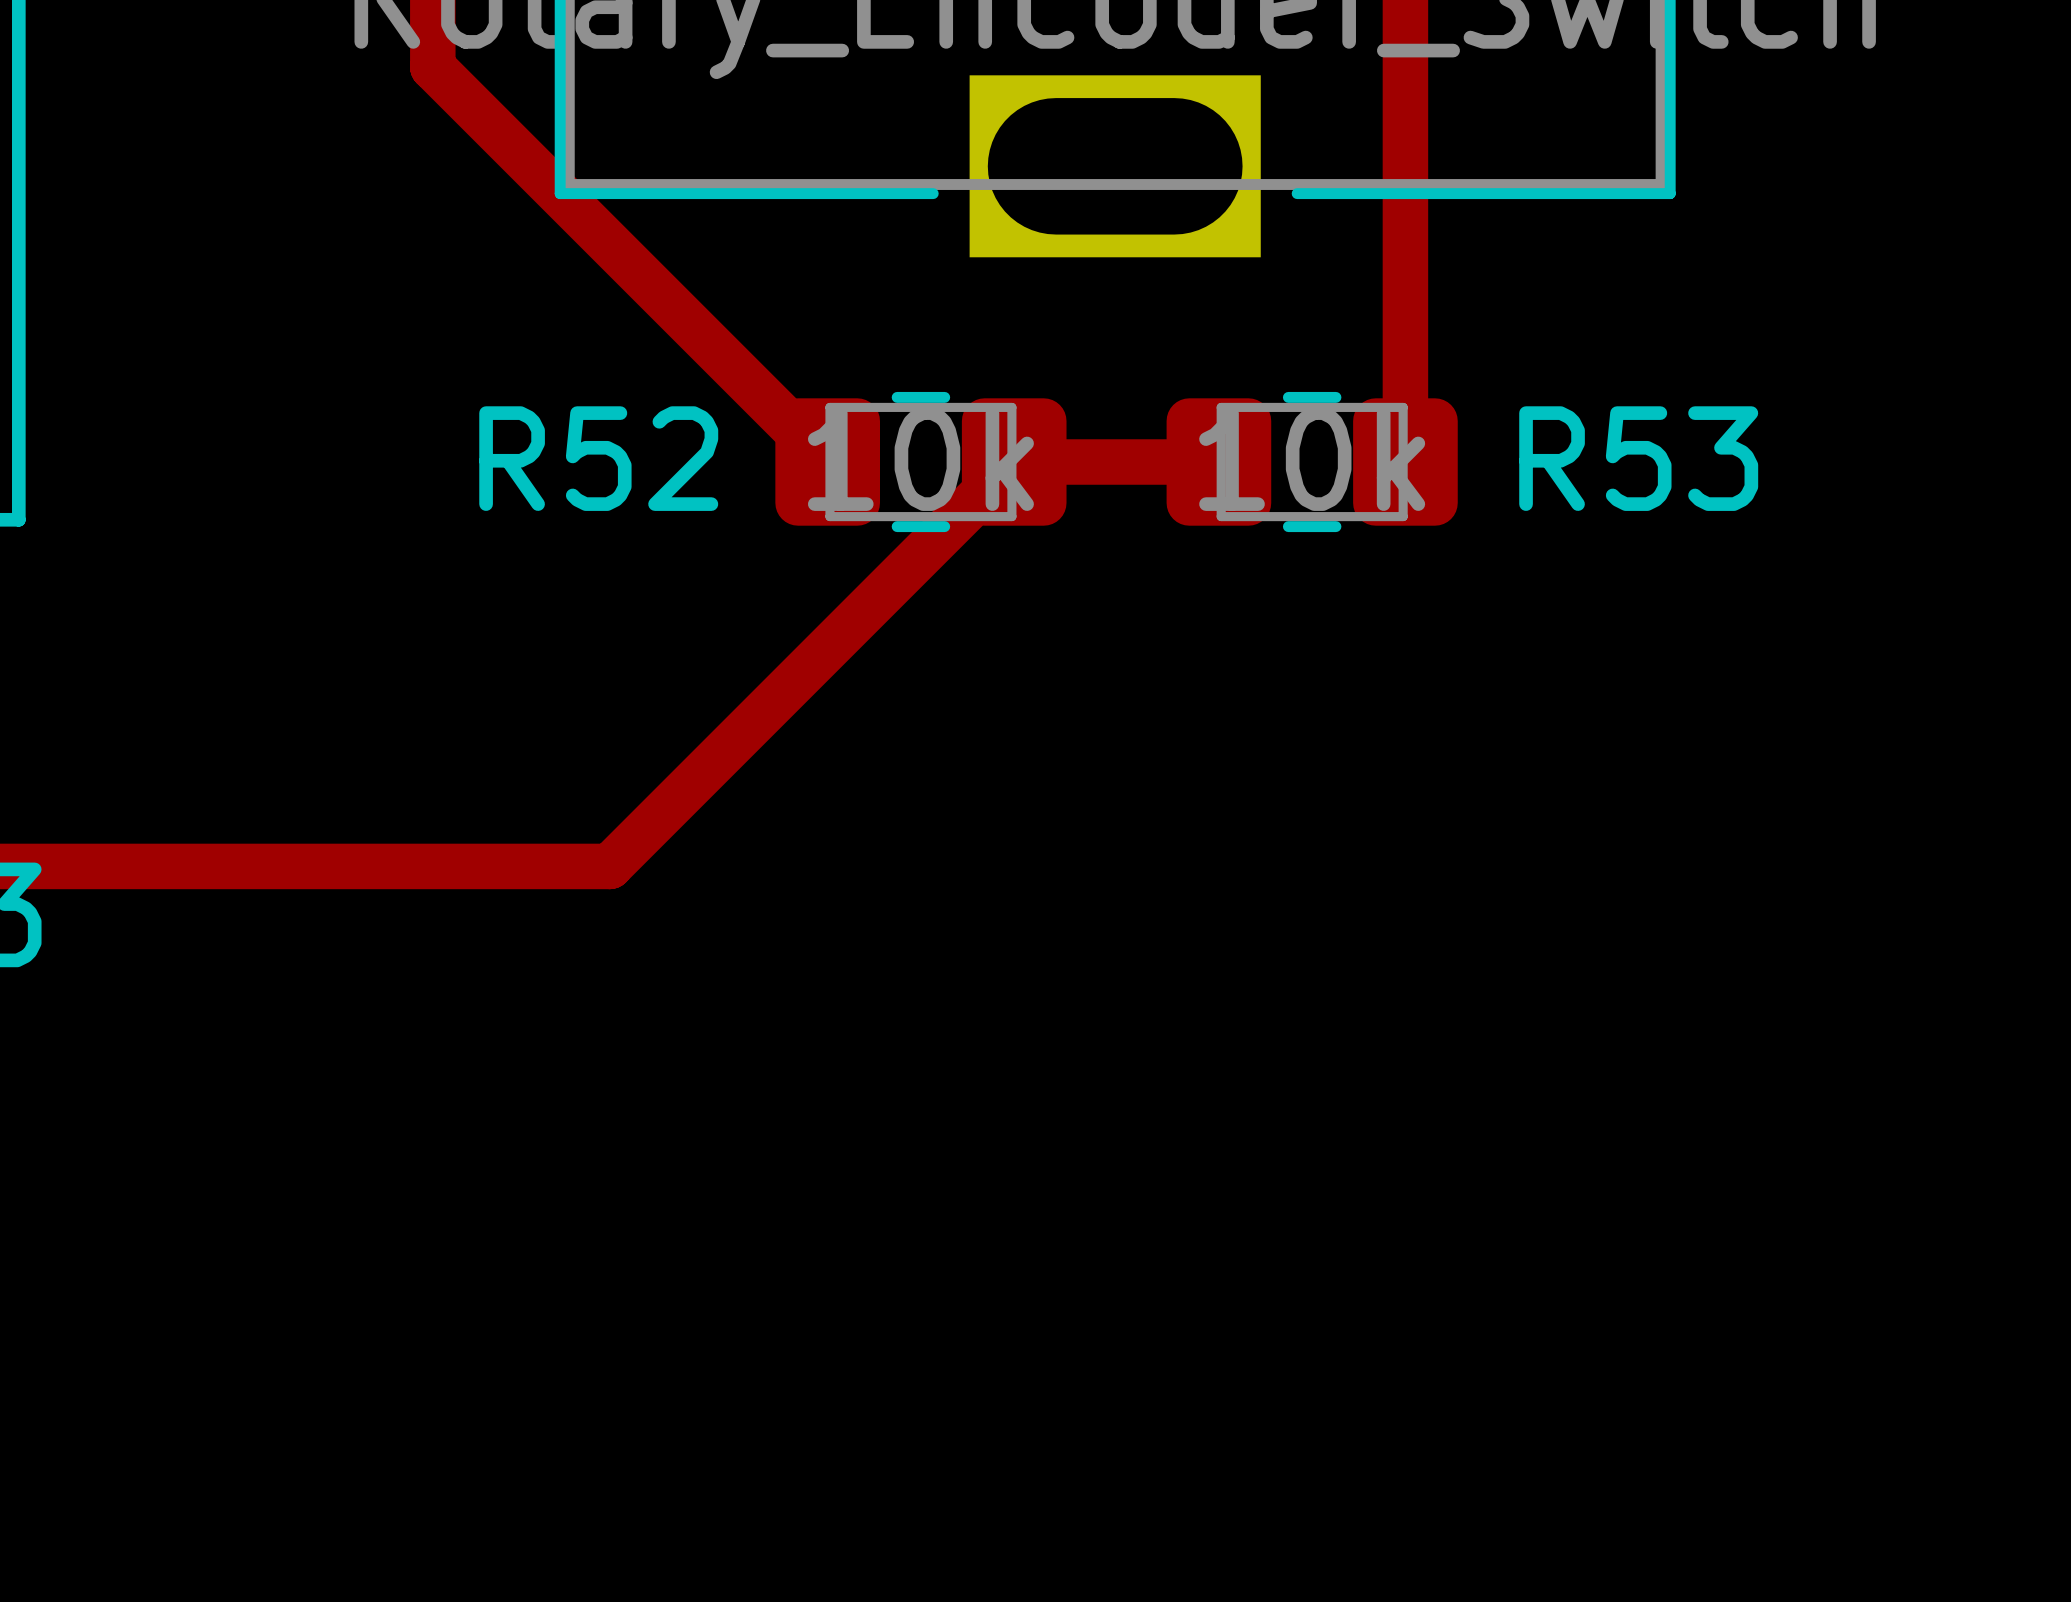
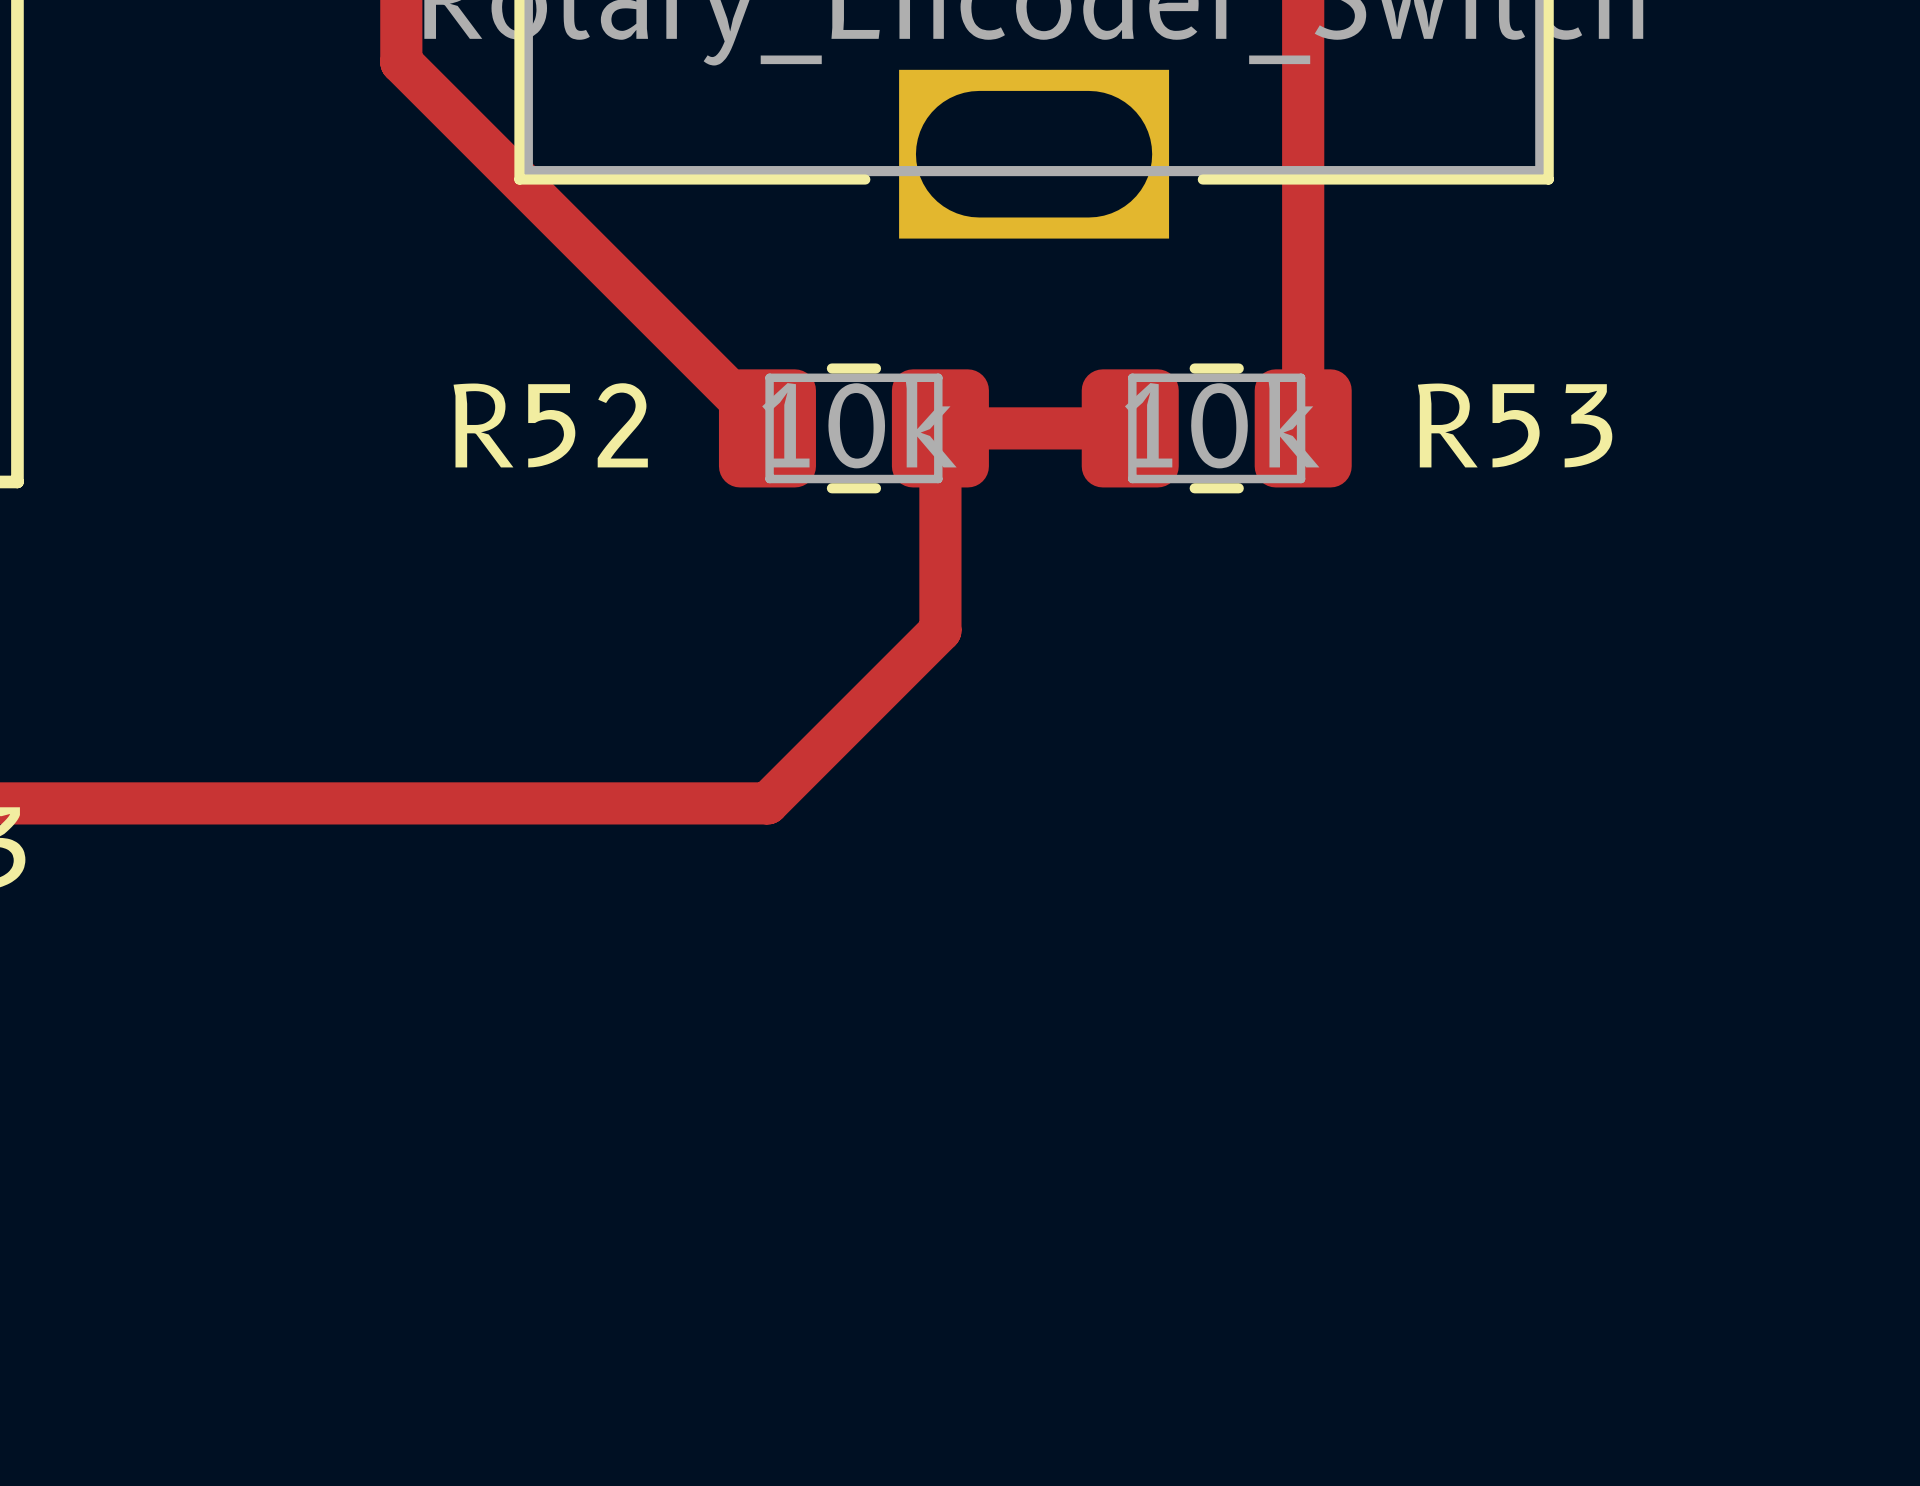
top track: (1014, 462) (609, 866) -> (940, 428) (940, 630) (767, 803) (565, 803)

